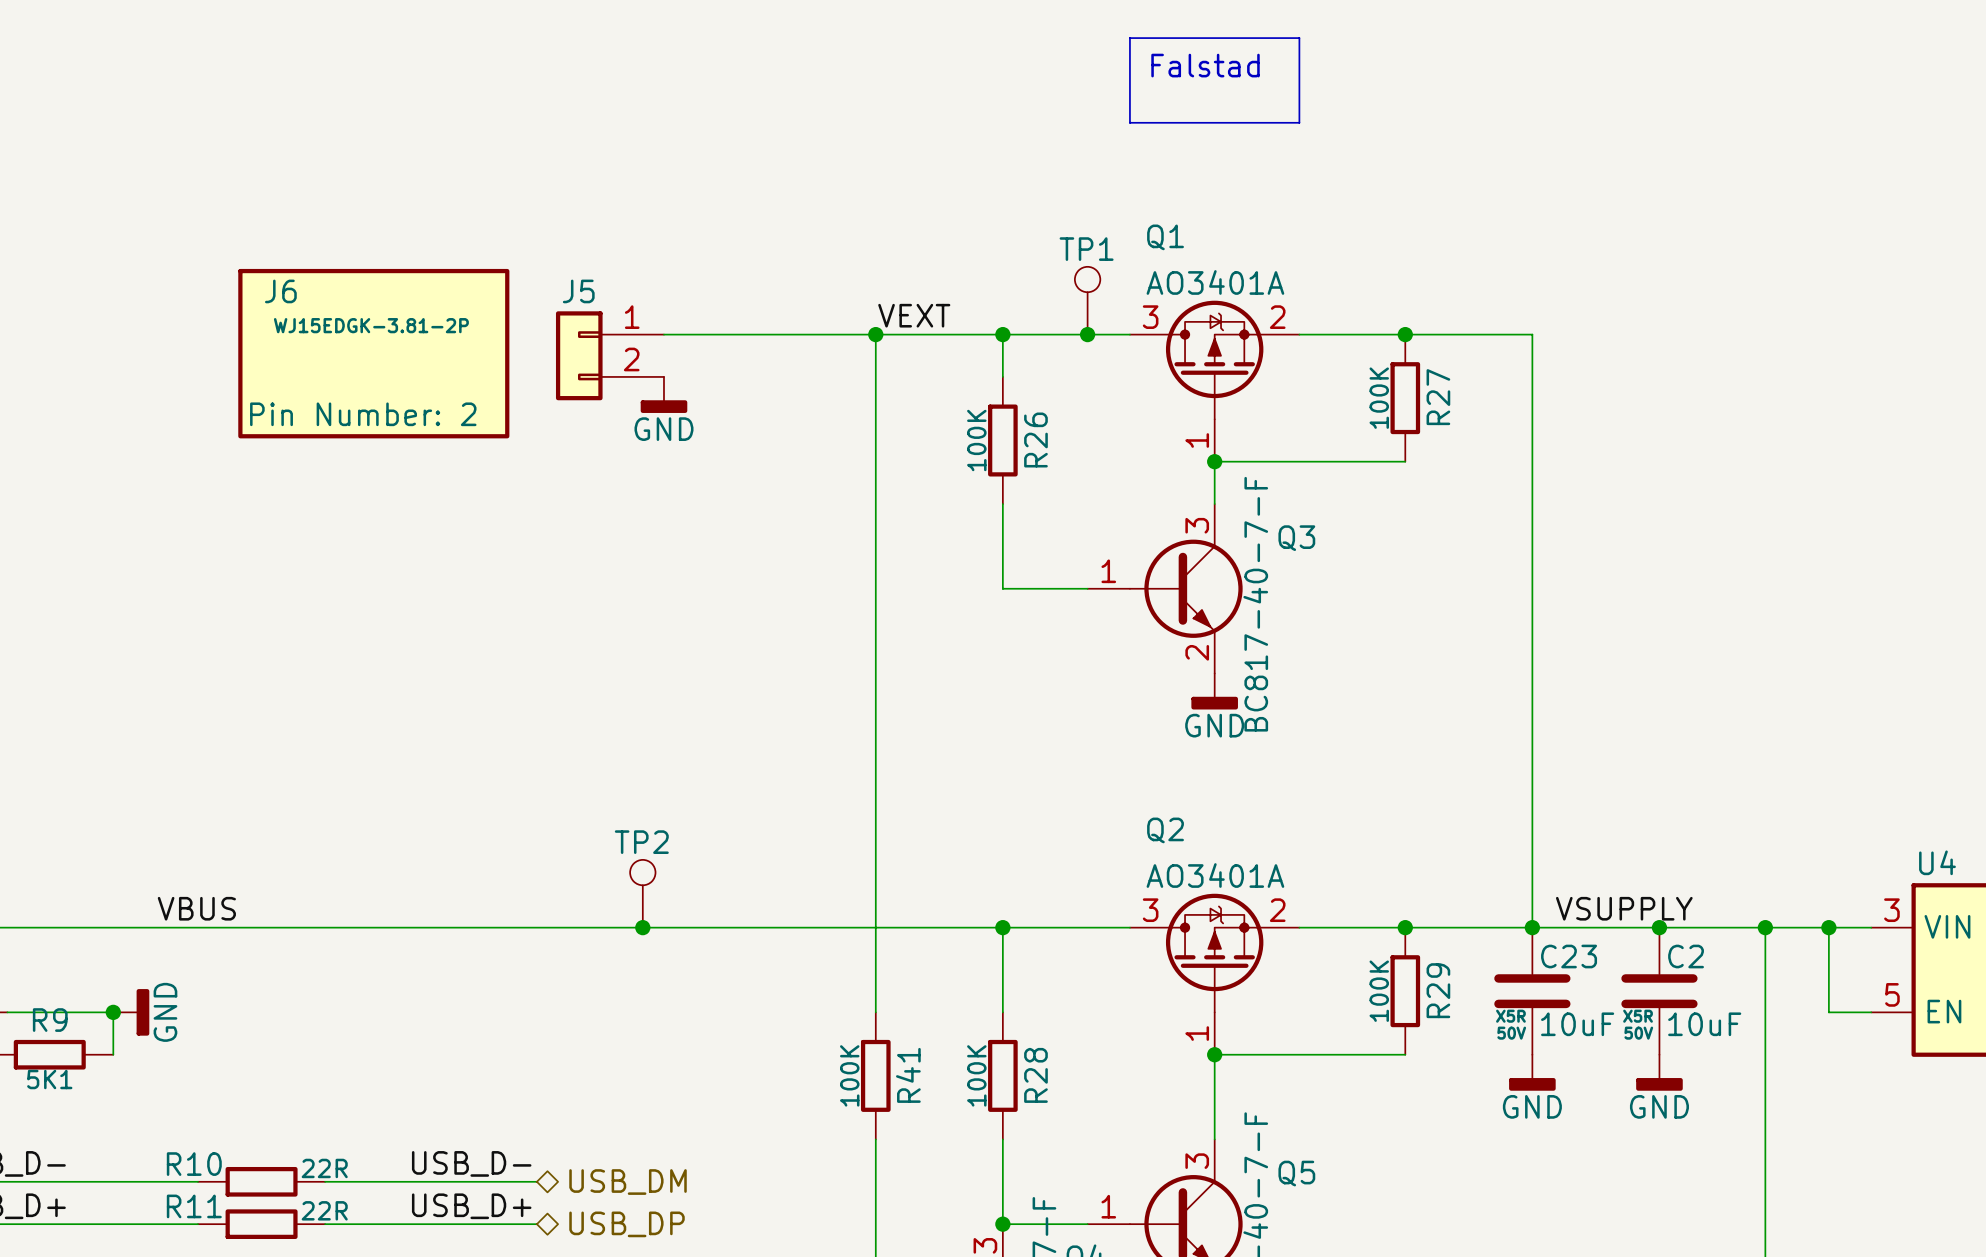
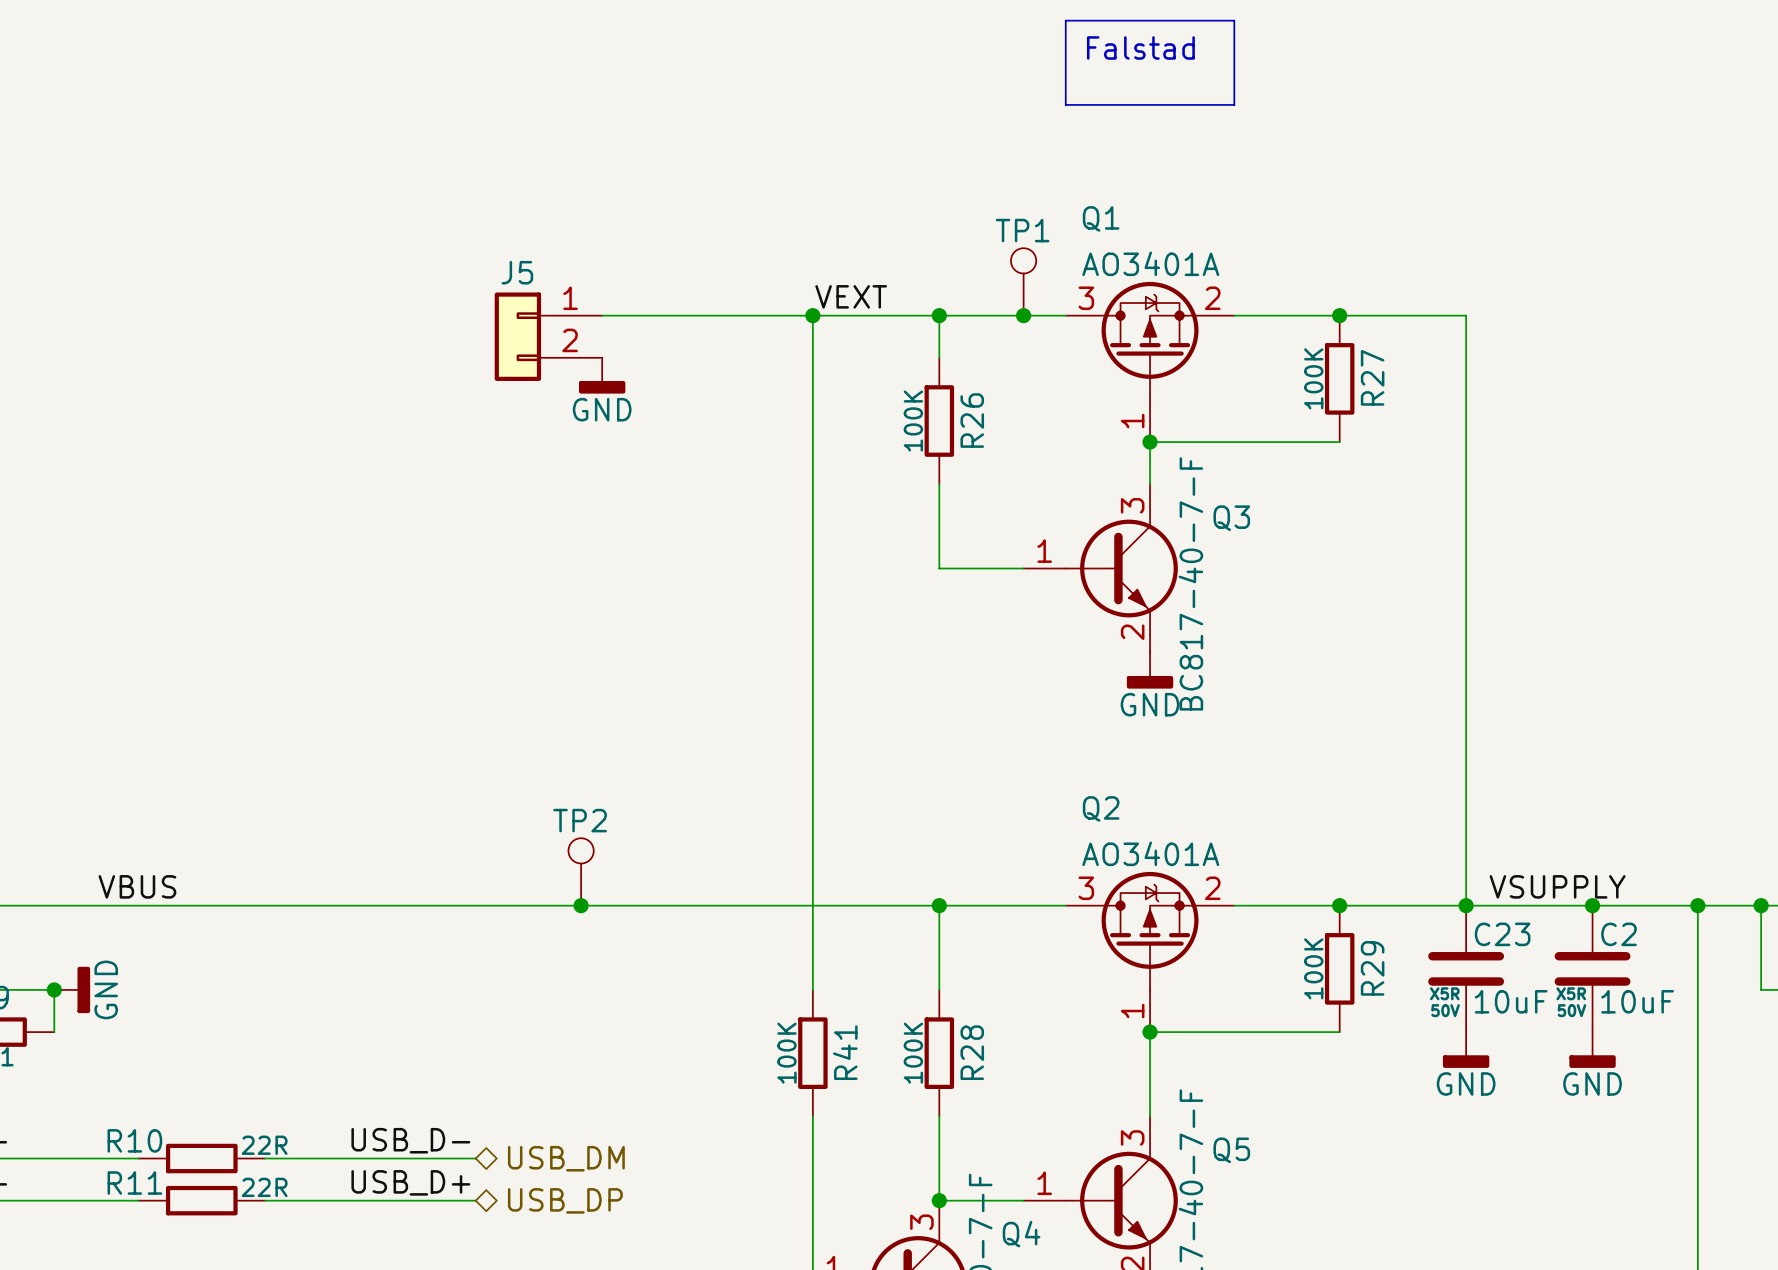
J6: WJ15EDGK-3.81-2P (373, 353) -> none

